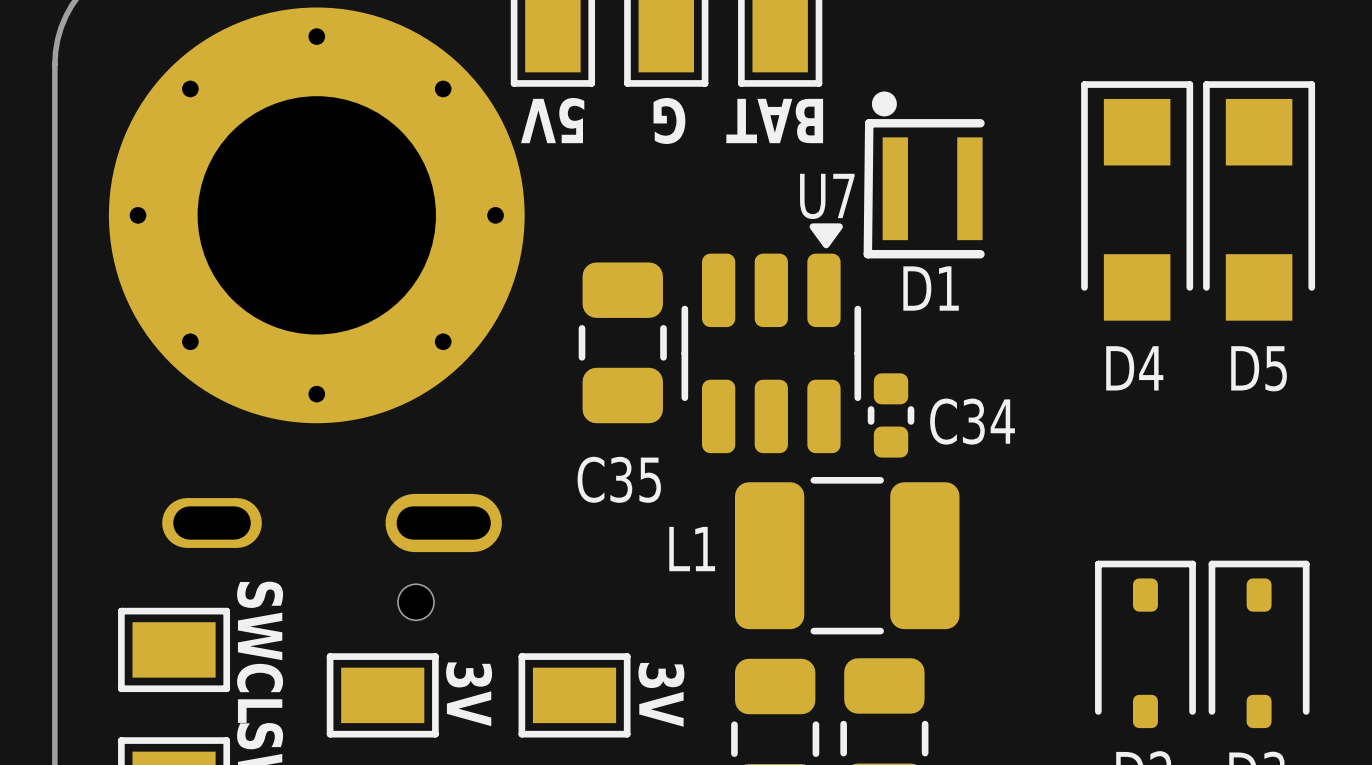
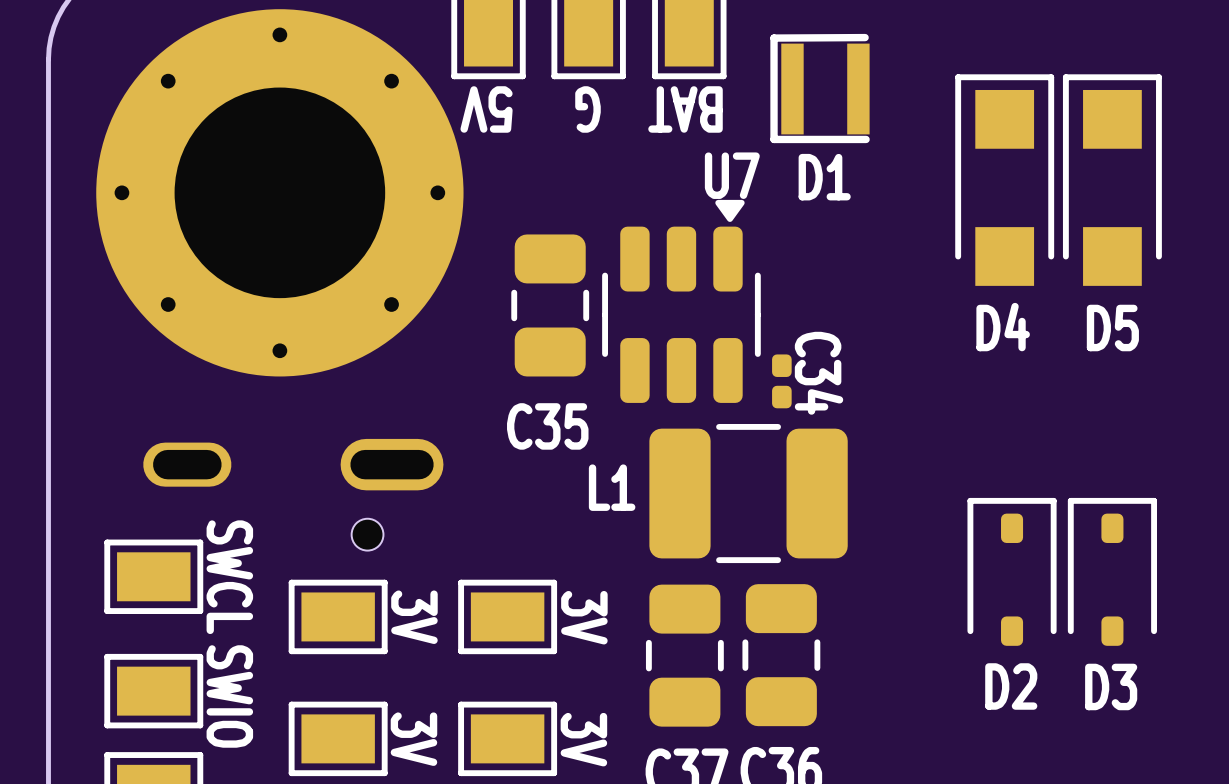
drawing: [871, 91, 897, 117] -> none
D1 footprint: [863, 119, 985, 259] -> [770, 33, 870, 144]
C34 footprint: [867, 373, 915, 458] -> [772, 354, 792, 409]

